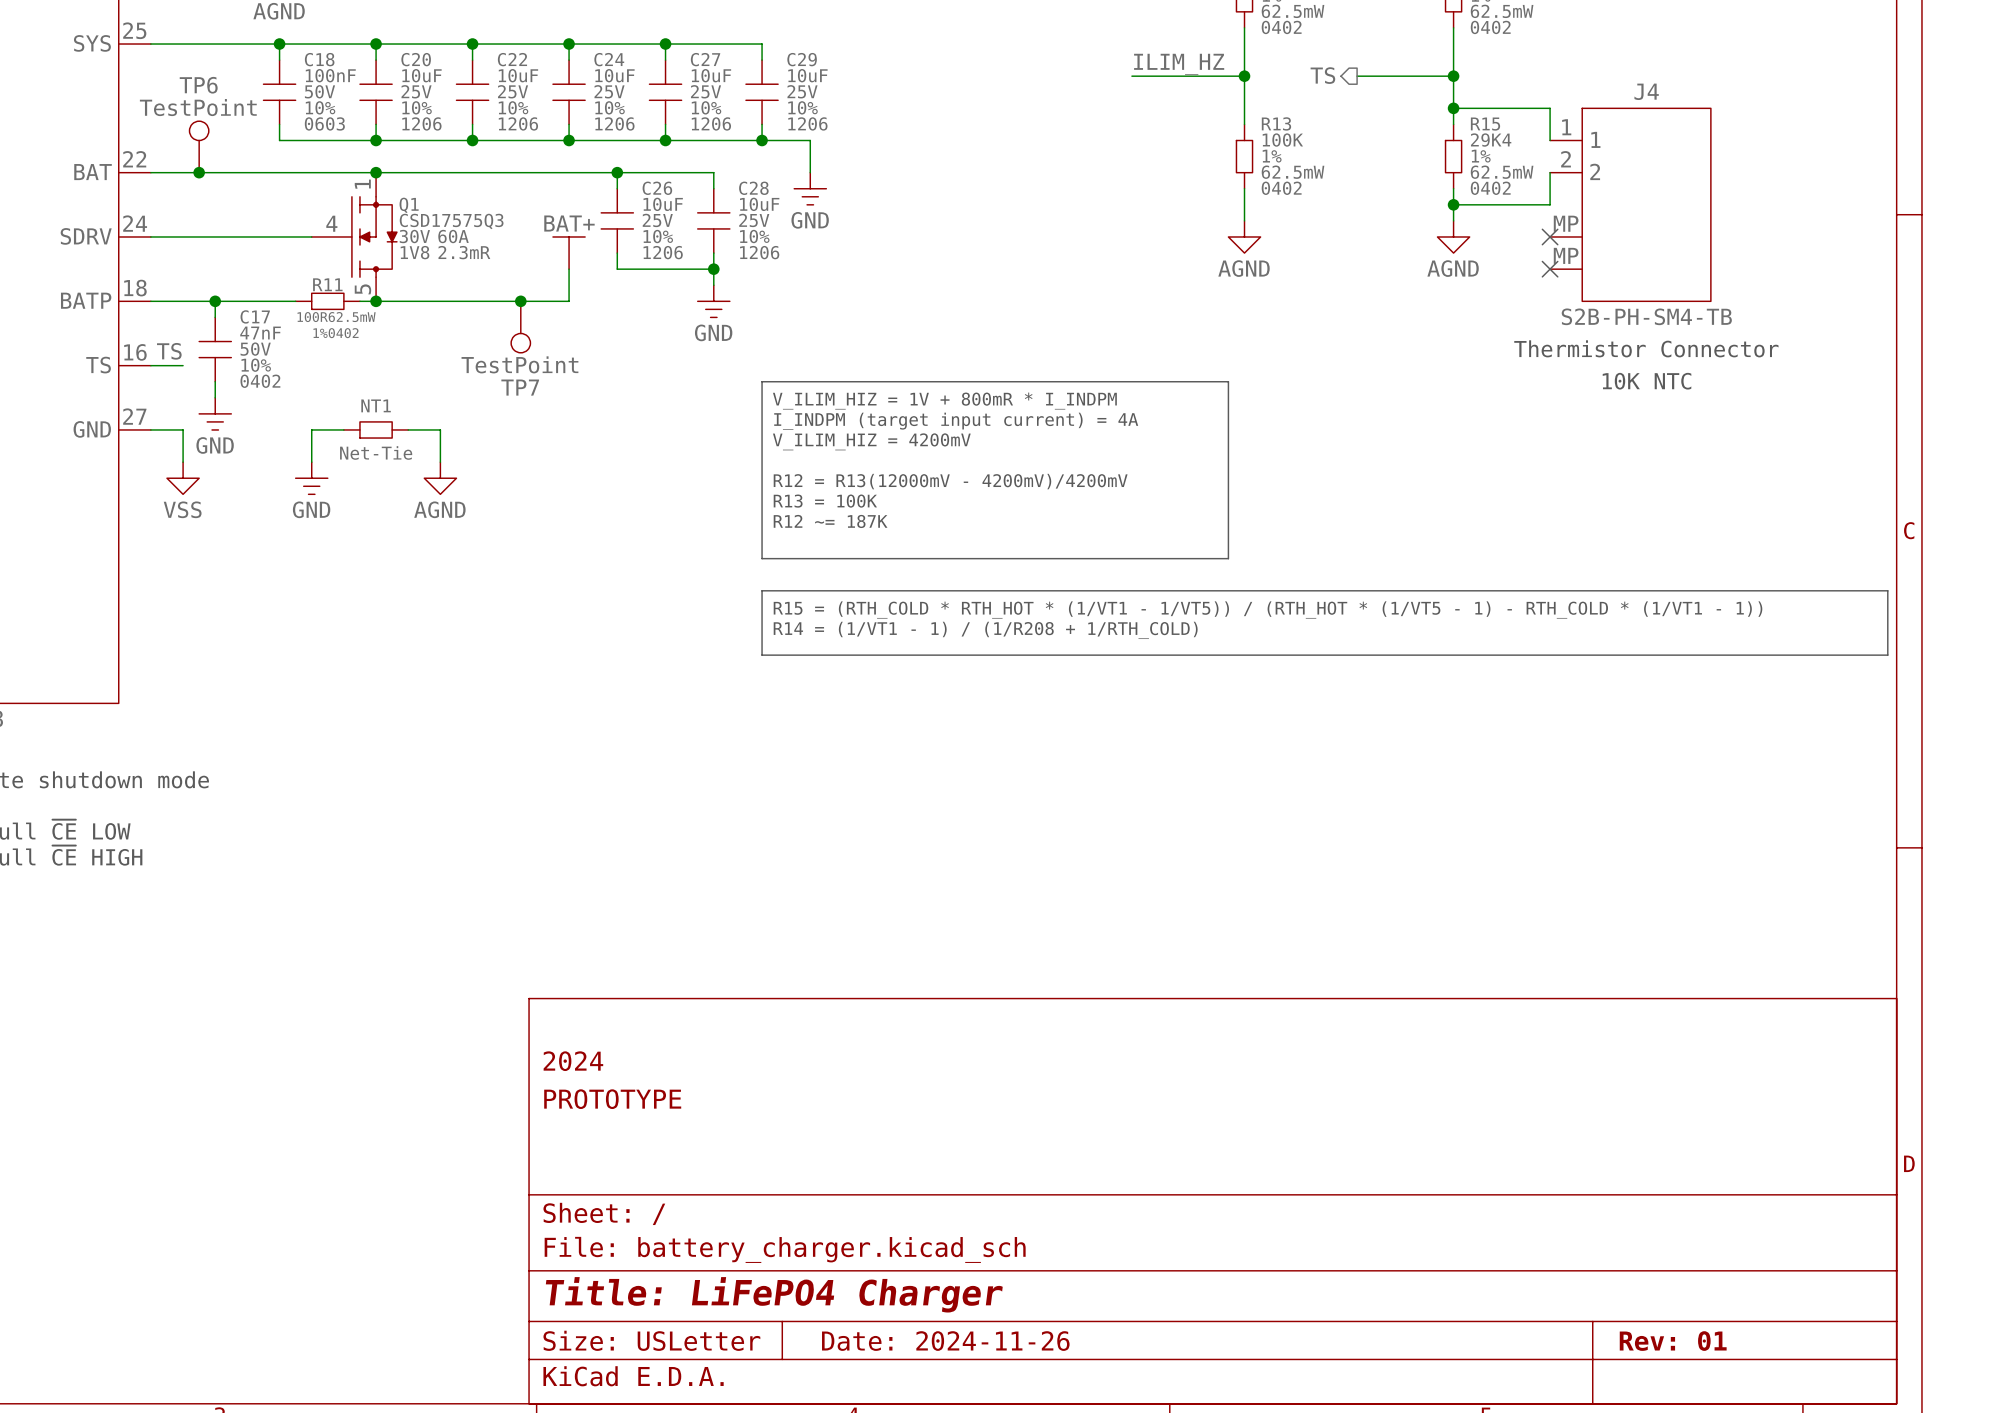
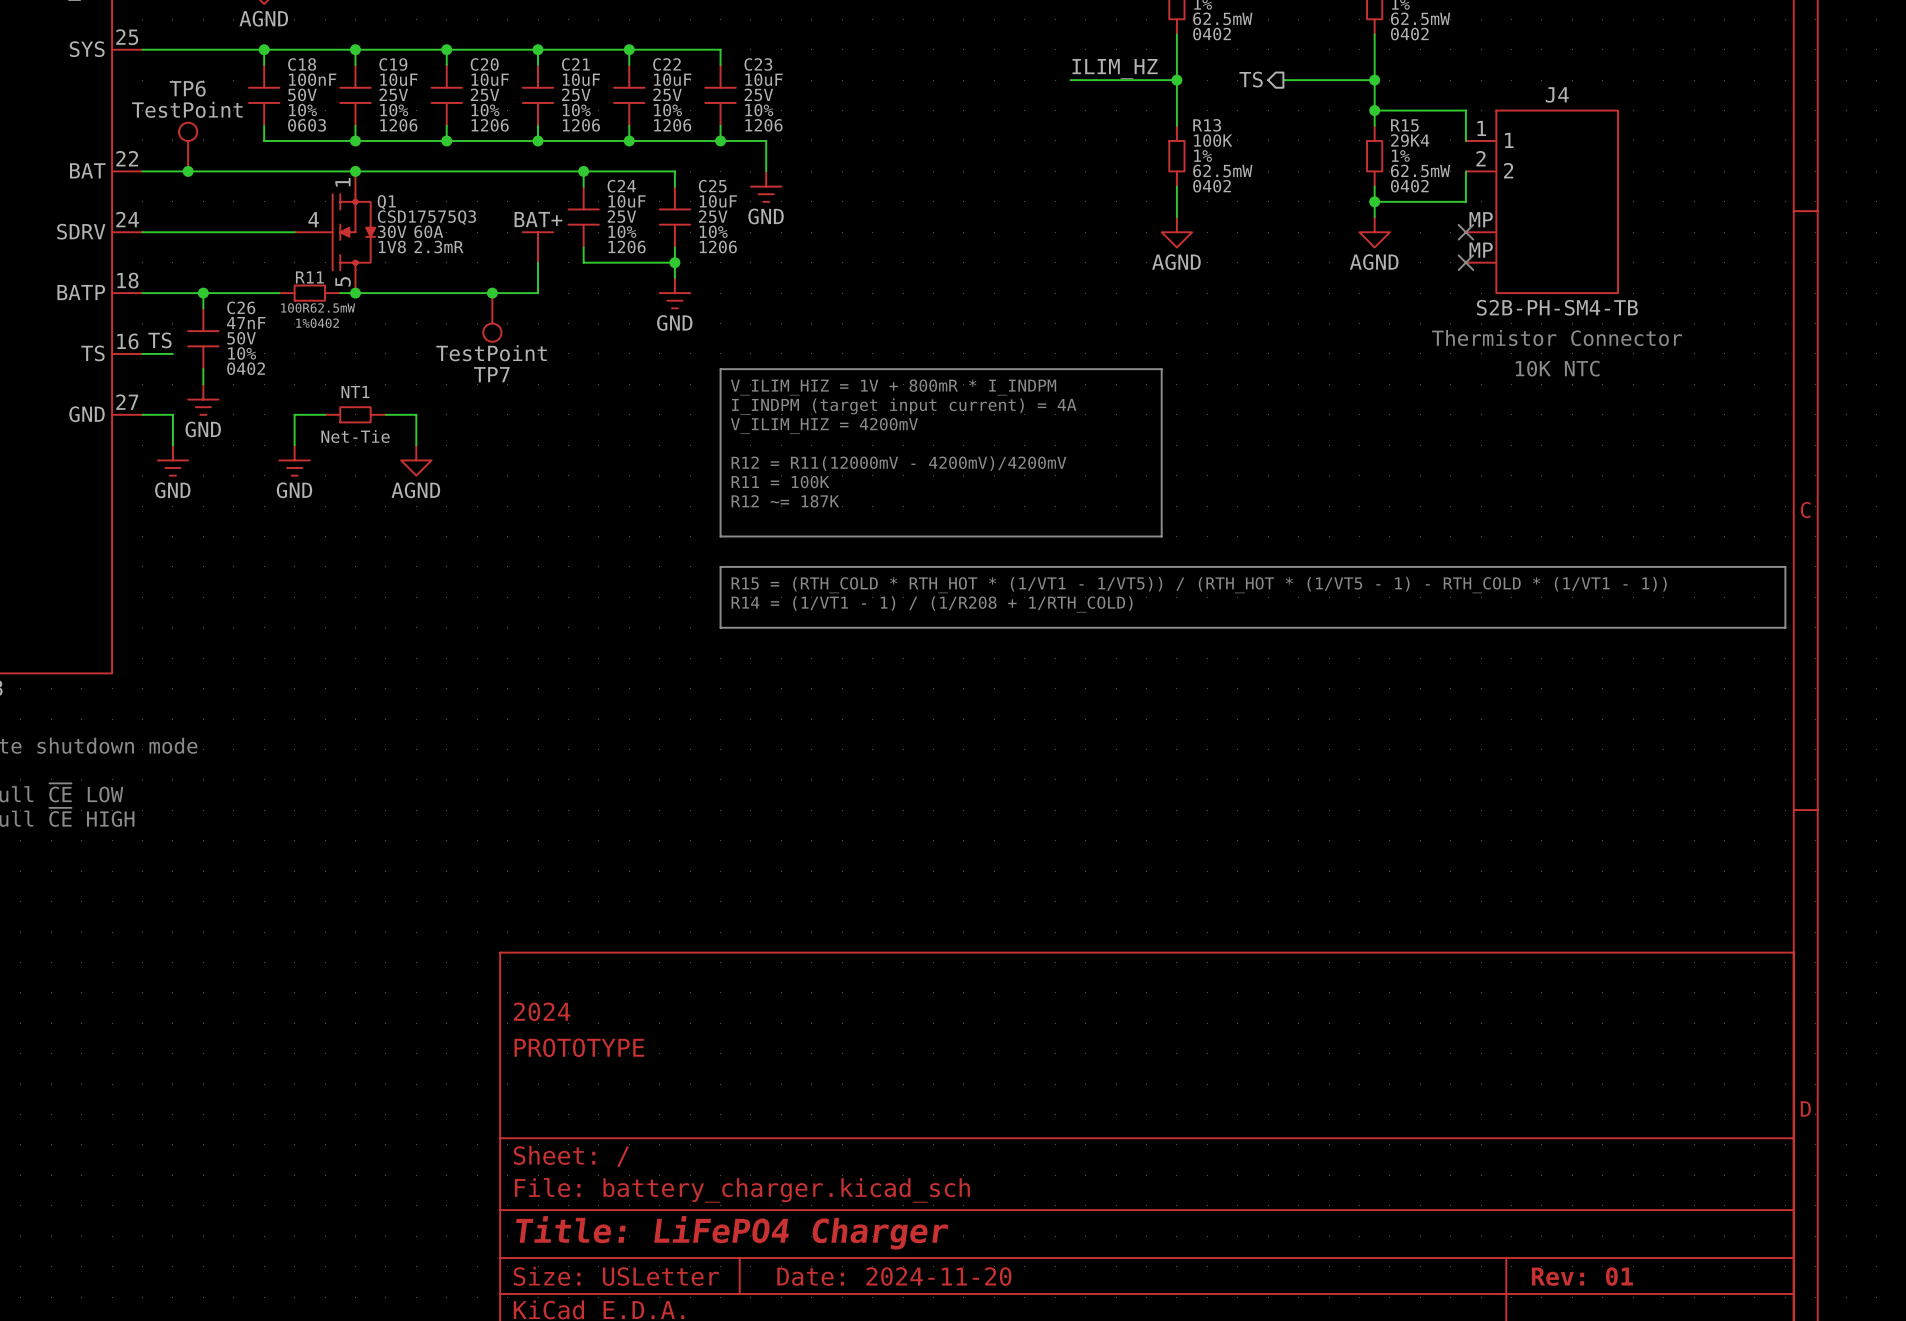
C20 name: C20 (416, 59) -> C19 (393, 64)
C22 name: C22 (512, 59) -> C20 (484, 64)
C24 name: C24 (609, 59) -> C21 (575, 64)
C27 name: C27 (705, 59) -> C22 (667, 64)
C29 name: C29 (802, 59) -> C23 (758, 64)
C26 name: C26 (657, 188) -> C24 (621, 186)
C28 name: C28 (753, 188) -> C25 (712, 186)
C17 name: C17 (255, 316) -> C26 (241, 307)
power symbol: VSS (183, 478) -> GND (172, 460)
text: R12 = R13(12000mV - 4200mV)/4200mV (950, 481) -> R12 = R11(12000mV - 4200mV)/4200mV (898, 463)
text: R13 = 100K (825, 501) -> R11 = 100K (780, 482)
title block: Date: 2024-11-26 (945, 1341) -> Date: 2024-11-20 (894, 1276)

